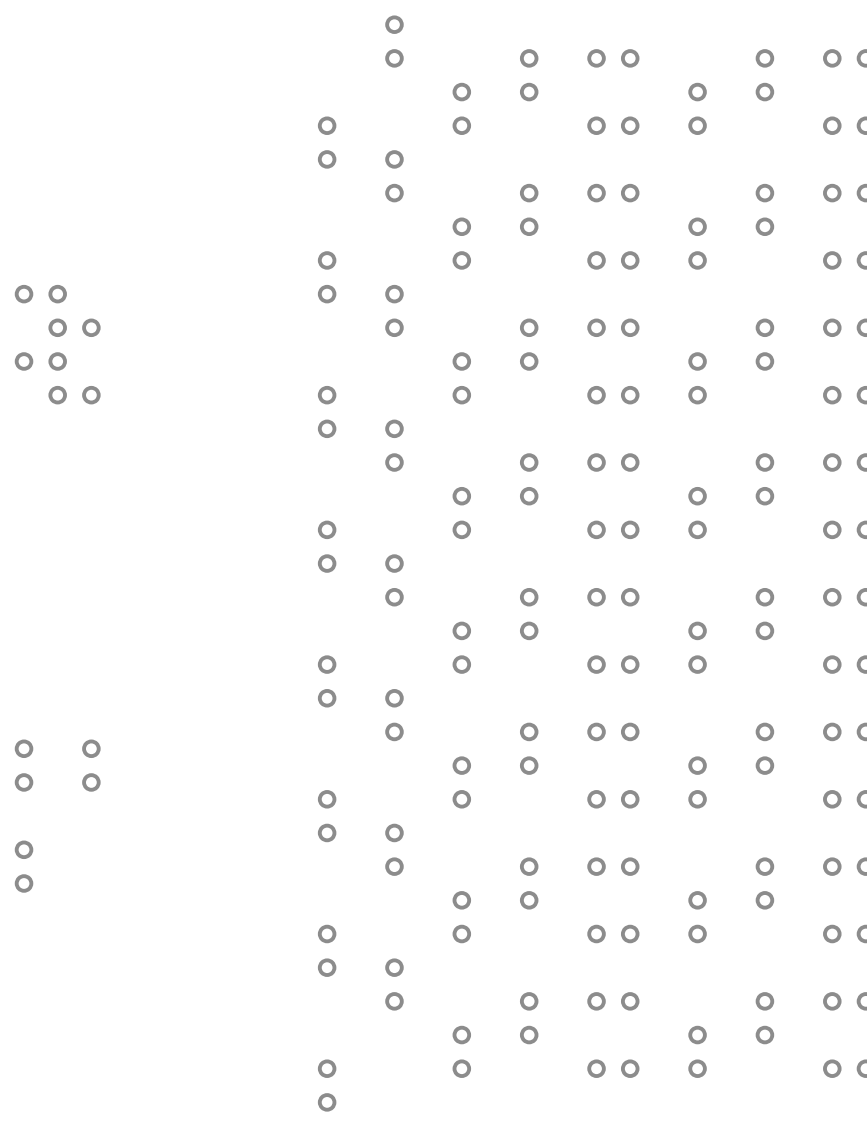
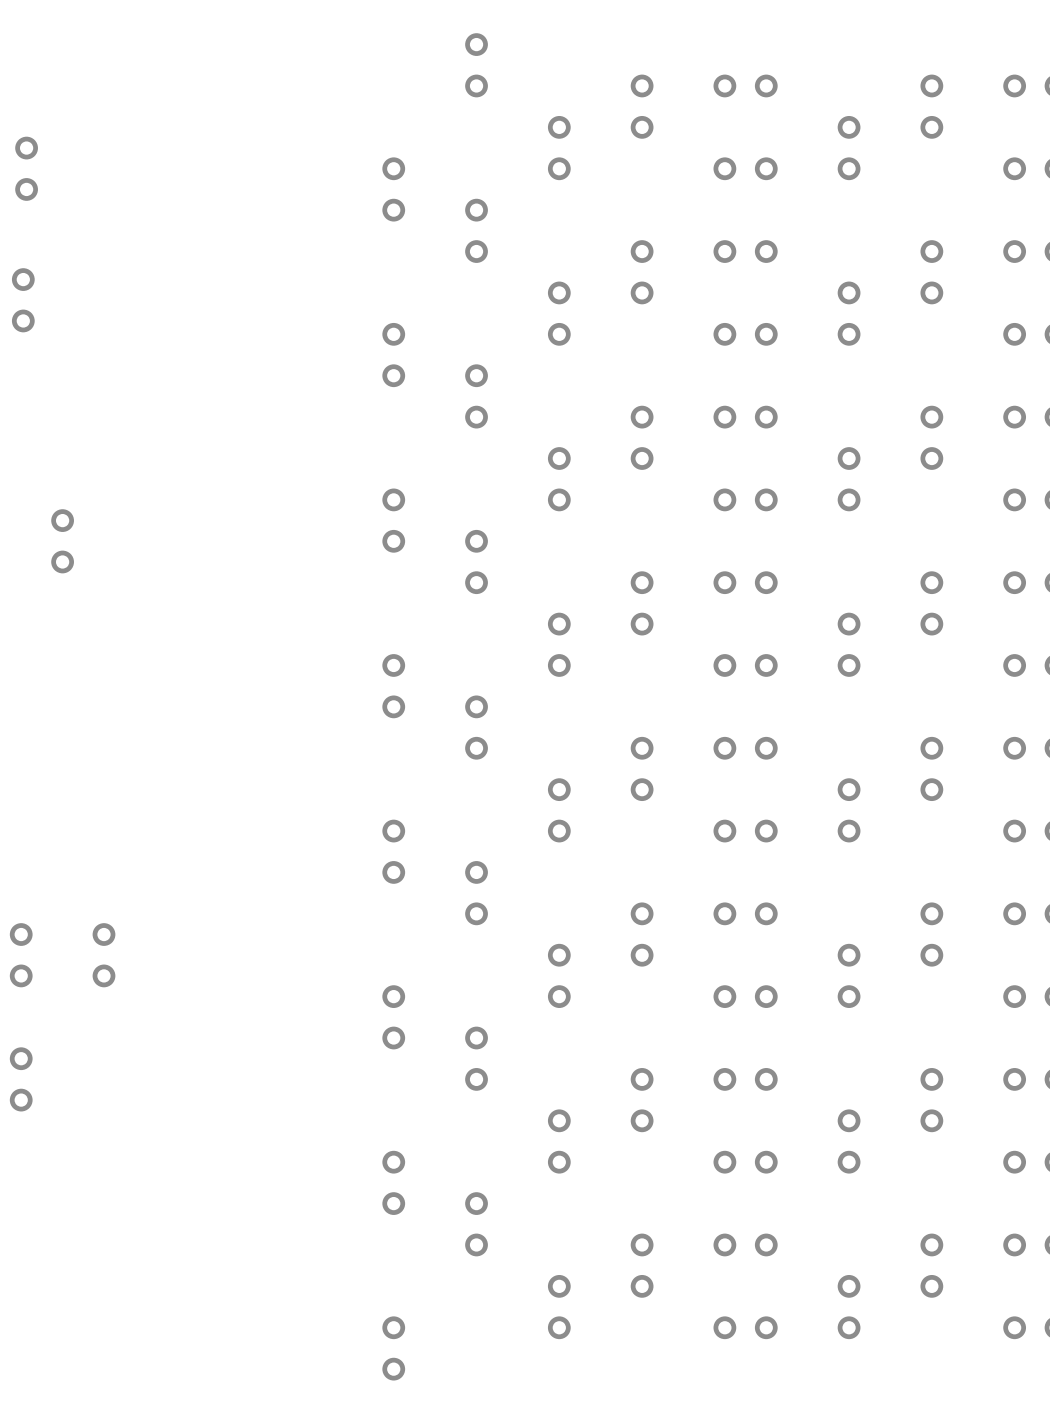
part: none -> (26, 168)
part: none -> (23, 300)
part: (40, 294) -> none
part: (74, 327) -> none
part: (40, 361) -> none
part: (74, 395) -> none
part: none -> (62, 541)

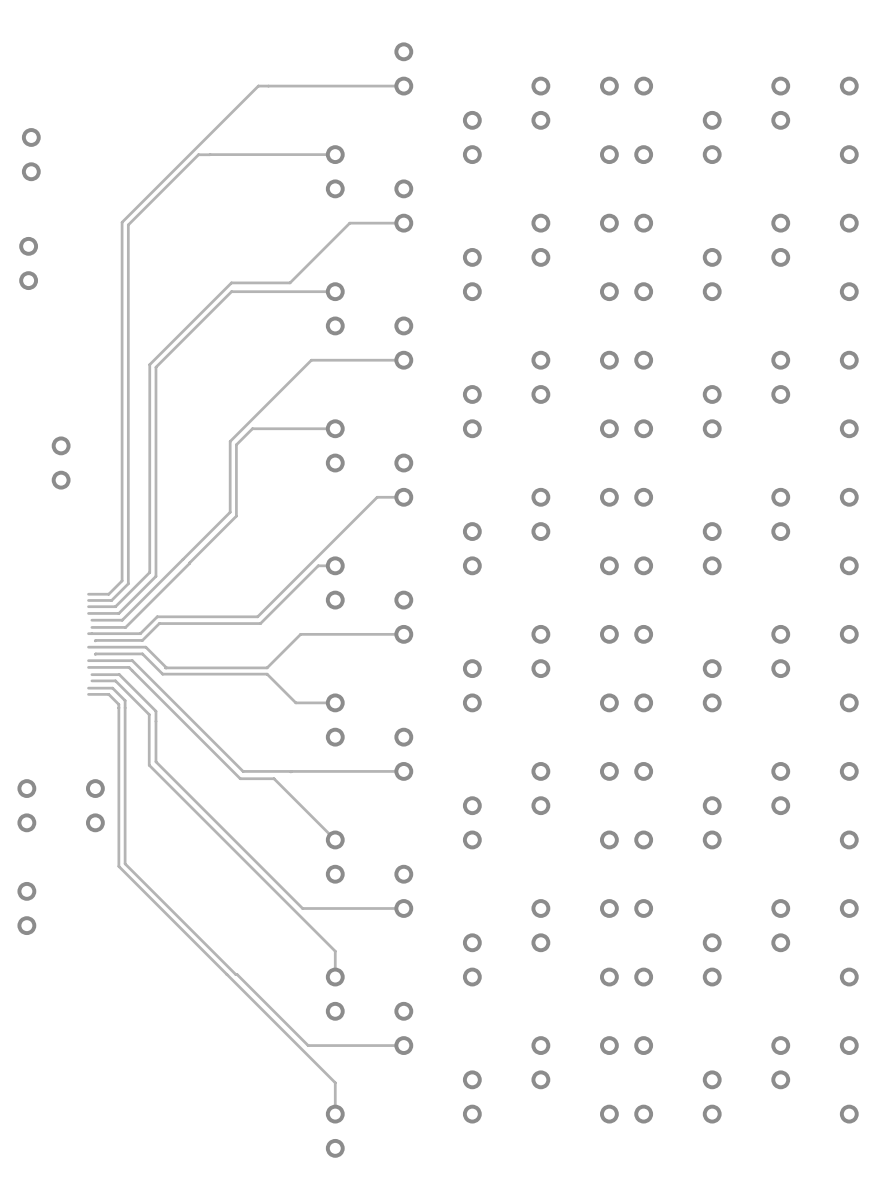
track: none -> (403, 86) (258, 86) (122, 222) (122, 580) (108, 594) (88, 594)
track: none -> (209, 154) (198, 154) (128, 224) (128, 583) (111, 600) (88, 600)
track: none -> (335, 154) (210, 154)
track: none -> (403, 223) (349, 223) (290, 282) (231, 282) (149, 364) (149, 572) (115, 606) (88, 606)
track: none -> (335, 291) (231, 291) (155, 367) (155, 576) (118, 613) (88, 613)
track: none -> (403, 360) (311, 360) (230, 441) (230, 512) (122, 620) (91, 620)
track: none -> (335, 428) (252, 428) (236, 444) (236, 516) (125, 627) (91, 627)
track: none -> (403, 497) (377, 497) (257, 616) (157, 616) (140, 633) (88, 633)
track: none -> (335, 565) (318, 565) (260, 623) (159, 623) (142, 640) (95, 640)
track: none -> (403, 634) (300, 634) (267, 667) (165, 667)
track: none -> (88, 647) (145, 647) (166, 667)
track: none -> (95, 654) (142, 653) (162, 674) (267, 674) (295, 702) (335, 702)
track: none -> (88, 660) (132, 660) (243, 771) (403, 771)
track: none -> (88, 667) (128, 667) (240, 778) (274, 778) (335, 839)
track: none -> (91, 674) (119, 674) (155, 711) (155, 761) (302, 908) (403, 908)
track: none -> (91, 680) (115, 680) (149, 714) (149, 765) (335, 951) (335, 977)
track: none -> (88, 688) (112, 688) (125, 700) (125, 863) (308, 1045) (403, 1045)
track: none -> (88, 694) (108, 694) (118, 704) (118, 866) (335, 1082) (335, 1114)

